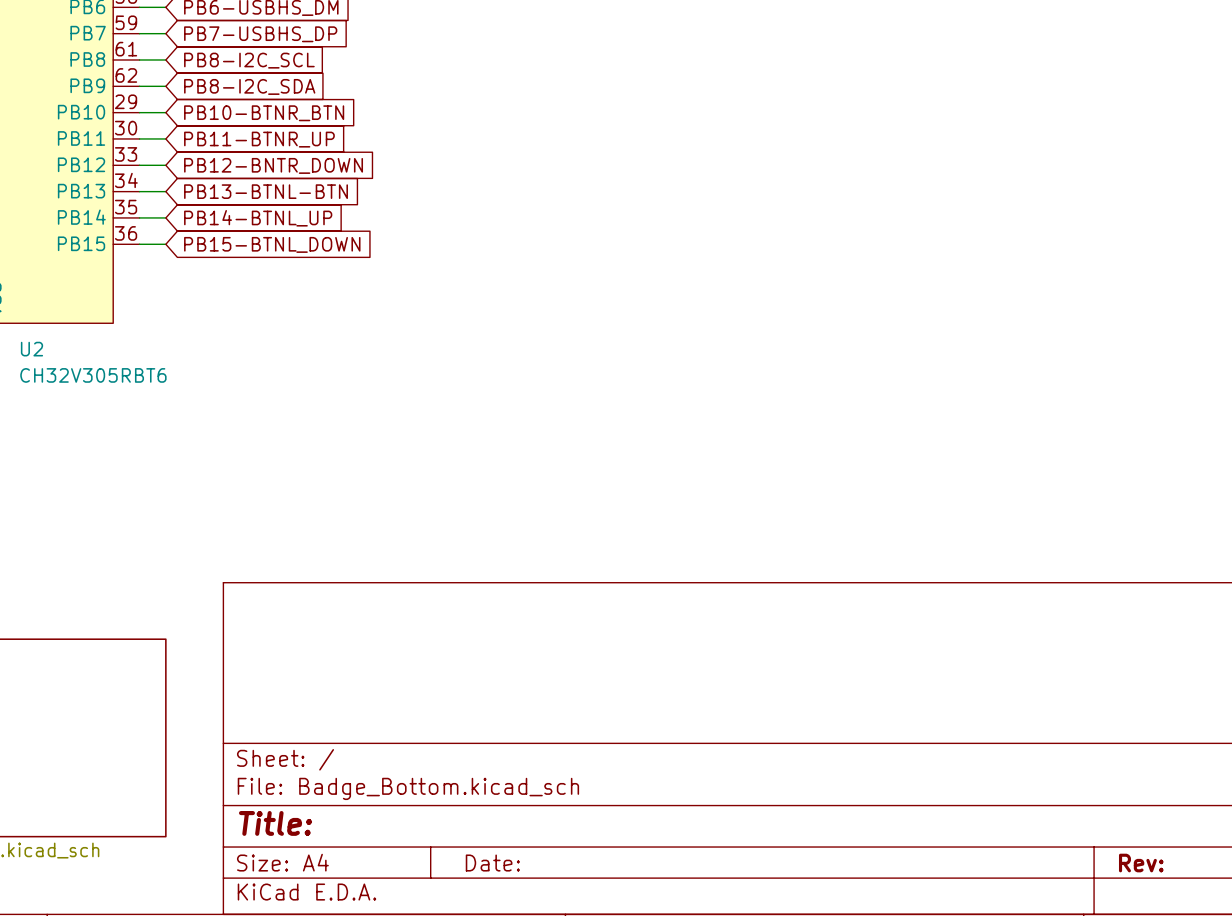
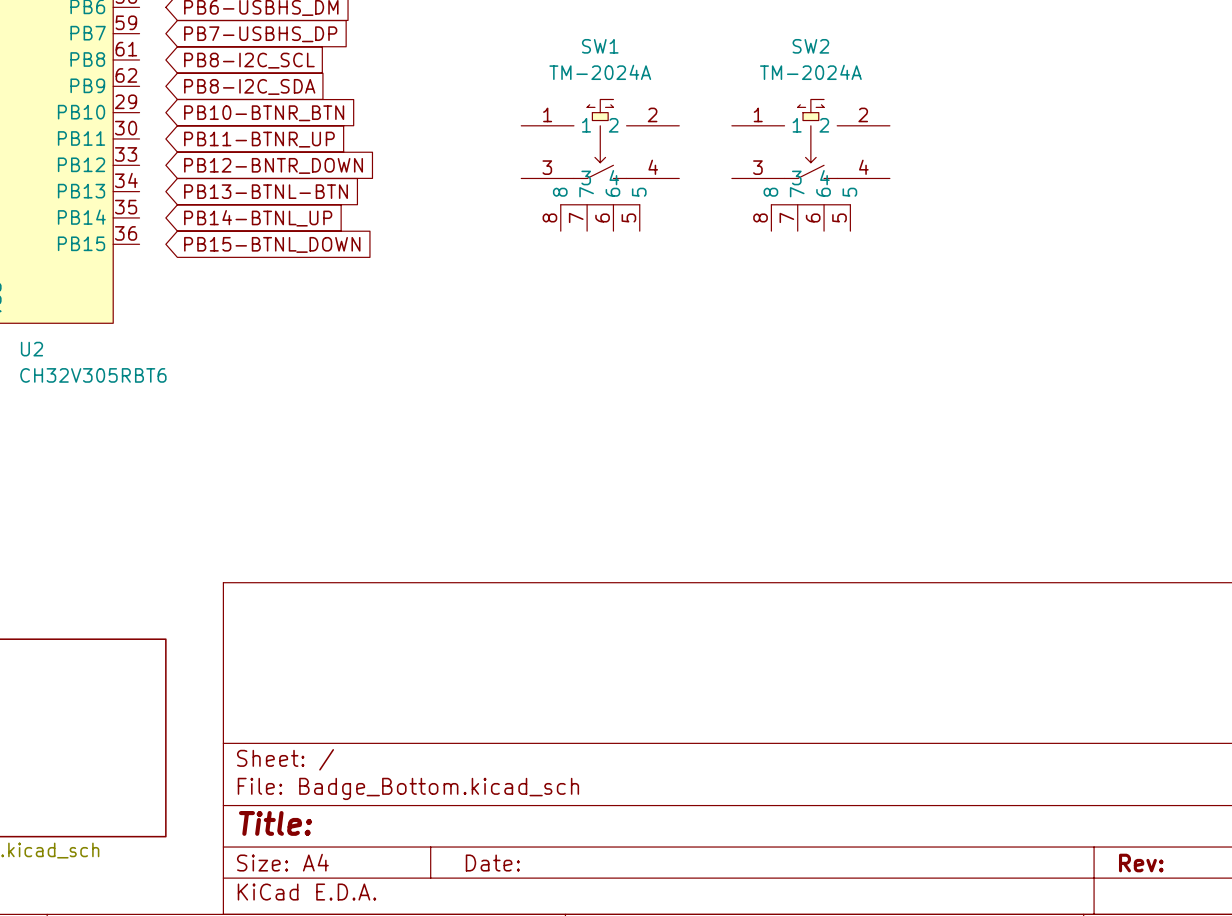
wire: (139, 7) (165, 7) -> none
wire: (139, 33) (165, 33) -> none
wire: (139, 59) (165, 59) -> none
wire: (139, 86) (165, 86) -> none
wire: (139, 112) (165, 112) -> none
wire: (139, 138) (165, 138) -> none
wire: (139, 165) (165, 165) -> none
SW1: none -> TM-2024A (600, 165)
SW2: none -> TM-2024A (810, 165)
wire: (139, 191) (165, 191) -> none
wire: (139, 217) (165, 217) -> none
wire: (139, 244) (165, 244) -> none

